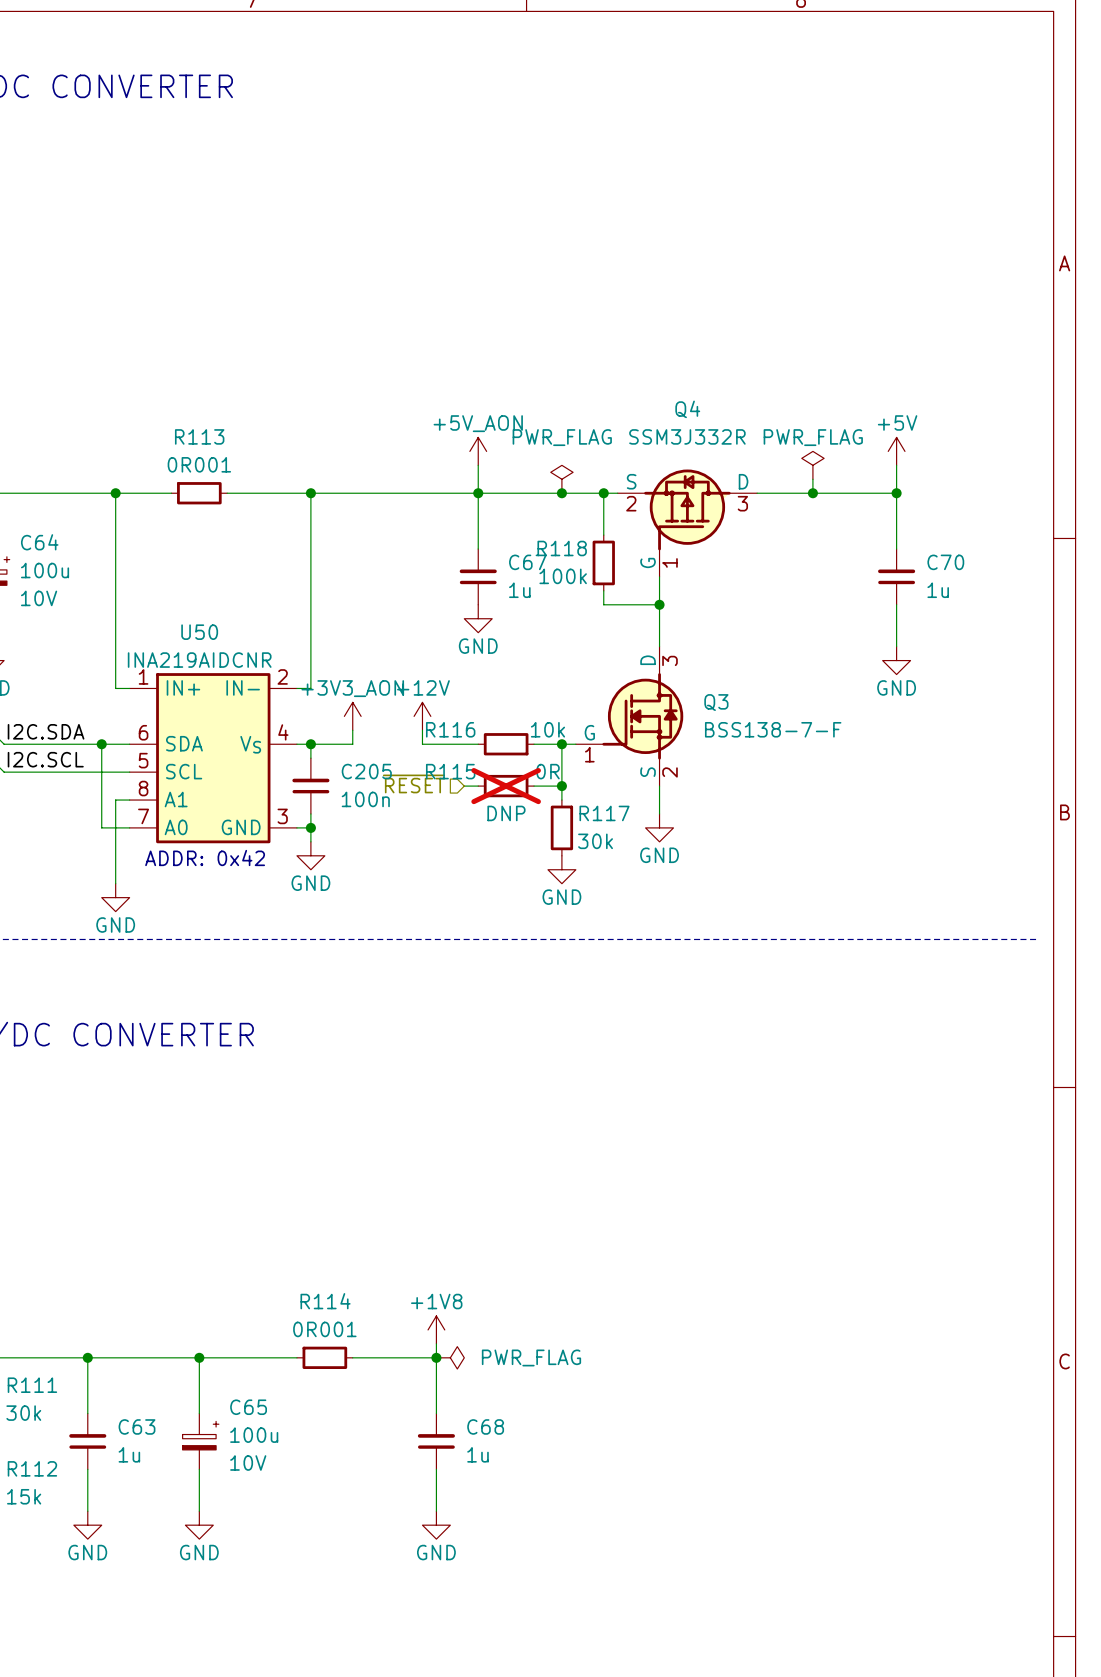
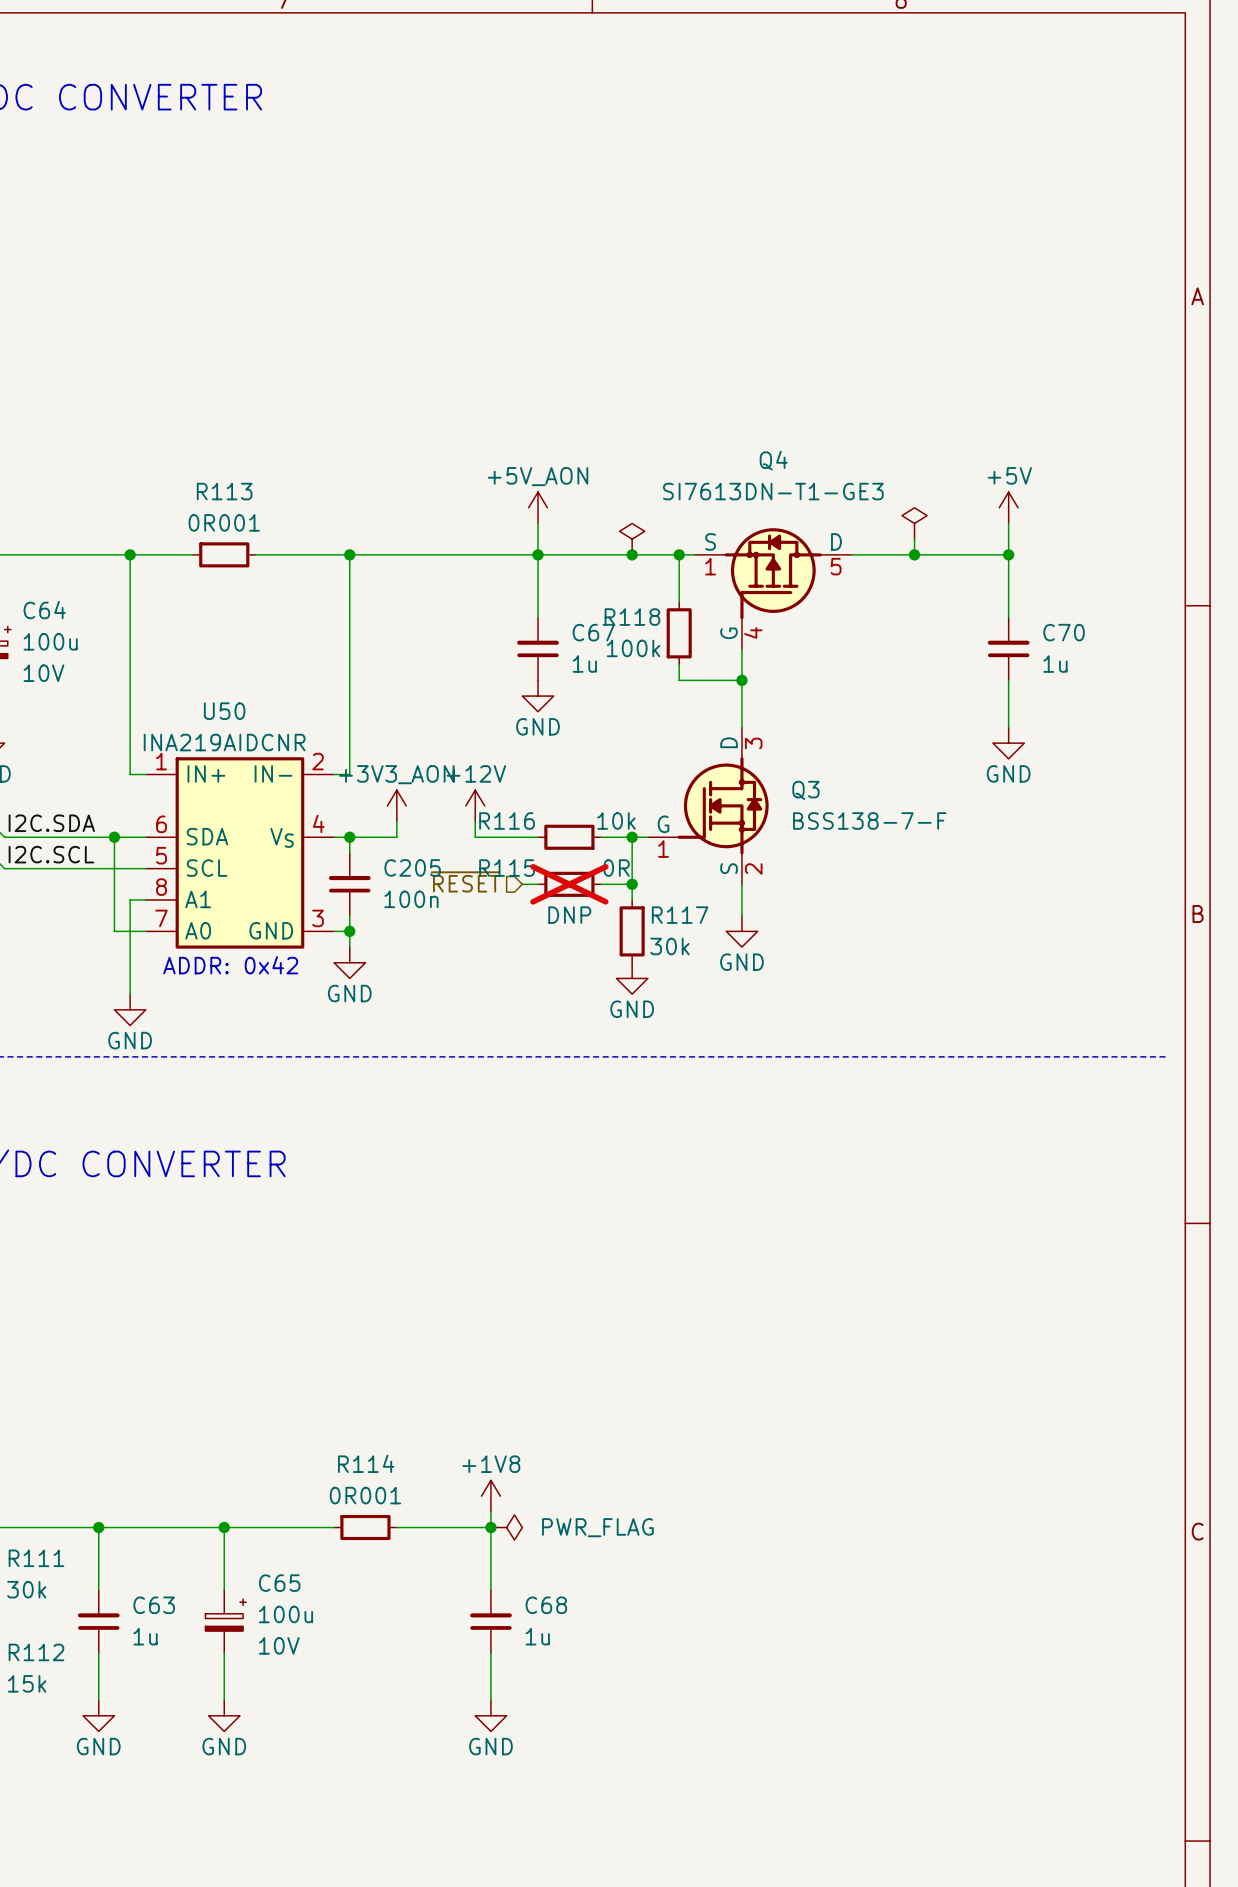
Q4 text: none -> SI7613DN-T1-GE3 (773, 491)
Q4 value: SSM3J332R (687, 436) -> none
power symbol text: PWR_FLAG (562, 437) -> none
power symbol text: PWR_FLAG (813, 437) -> none
Q4 symbol: [617, 469, 758, 577] -> [694, 528, 852, 650]

